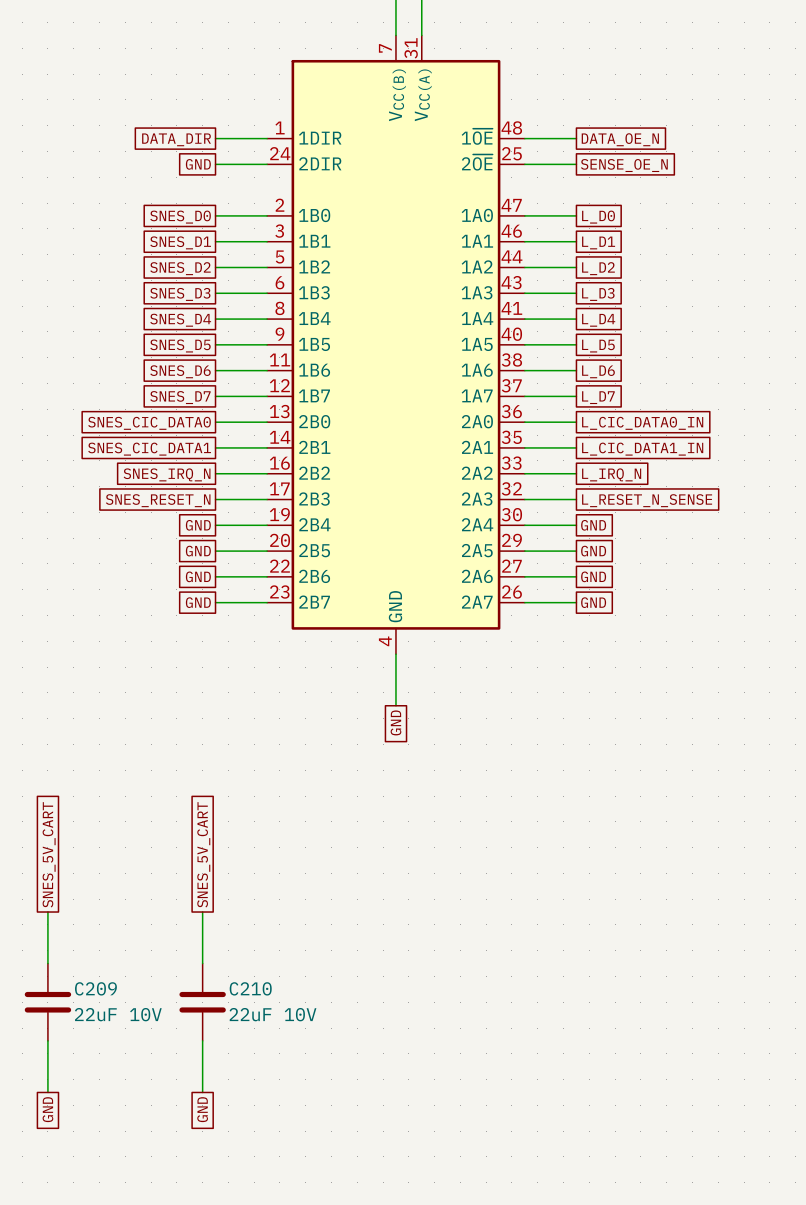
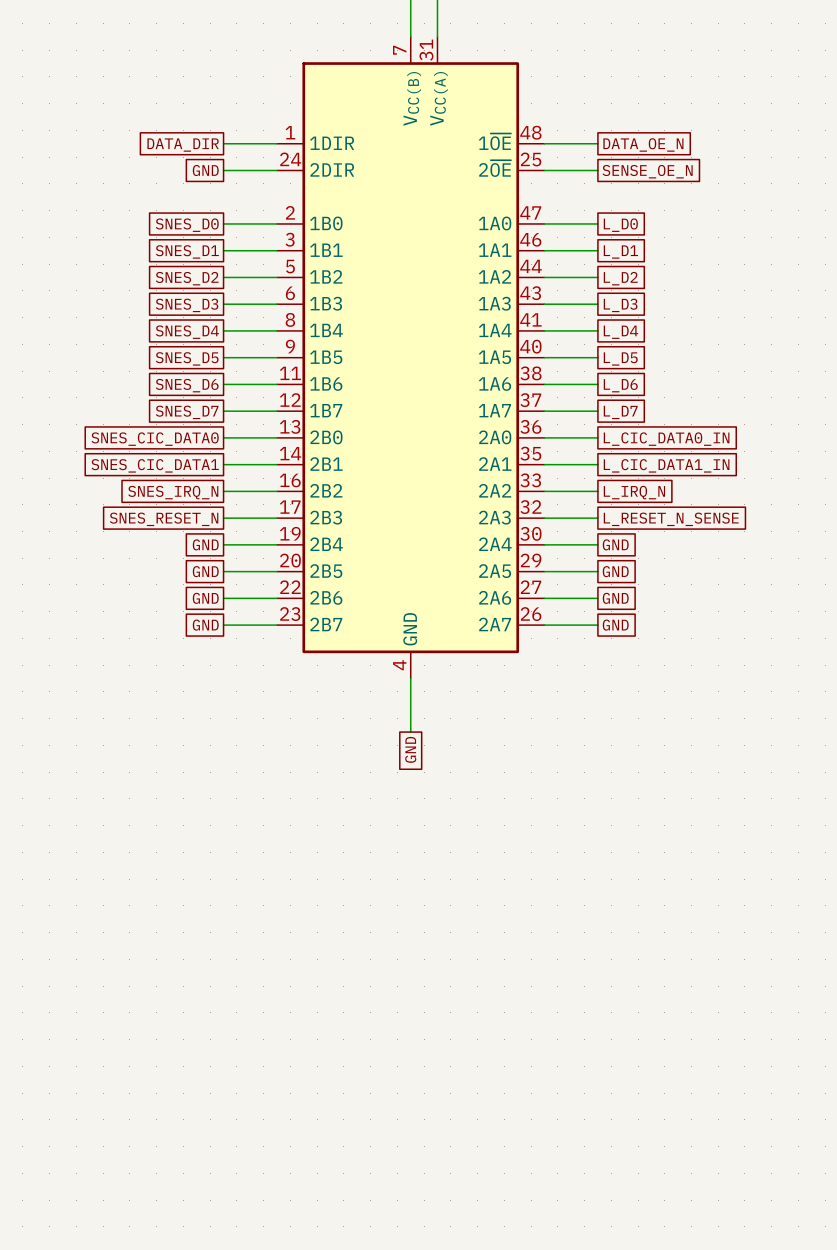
global label: SNES_5V_CART (49, 854) -> none
global label: SNES_5V_CART (203, 854) -> none
wire: (47, 912) (47, 963) -> none
wire: (202, 912) (202, 963) -> none
C209: 22uF 10V (47, 1002) -> none
C210: 22uF 10V (202, 1002) -> none
wire: (47, 1040) (47, 1092) -> none
wire: (202, 1040) (202, 1092) -> none
global label: GND (47, 1109) -> none
global label: GND (202, 1109) -> none

